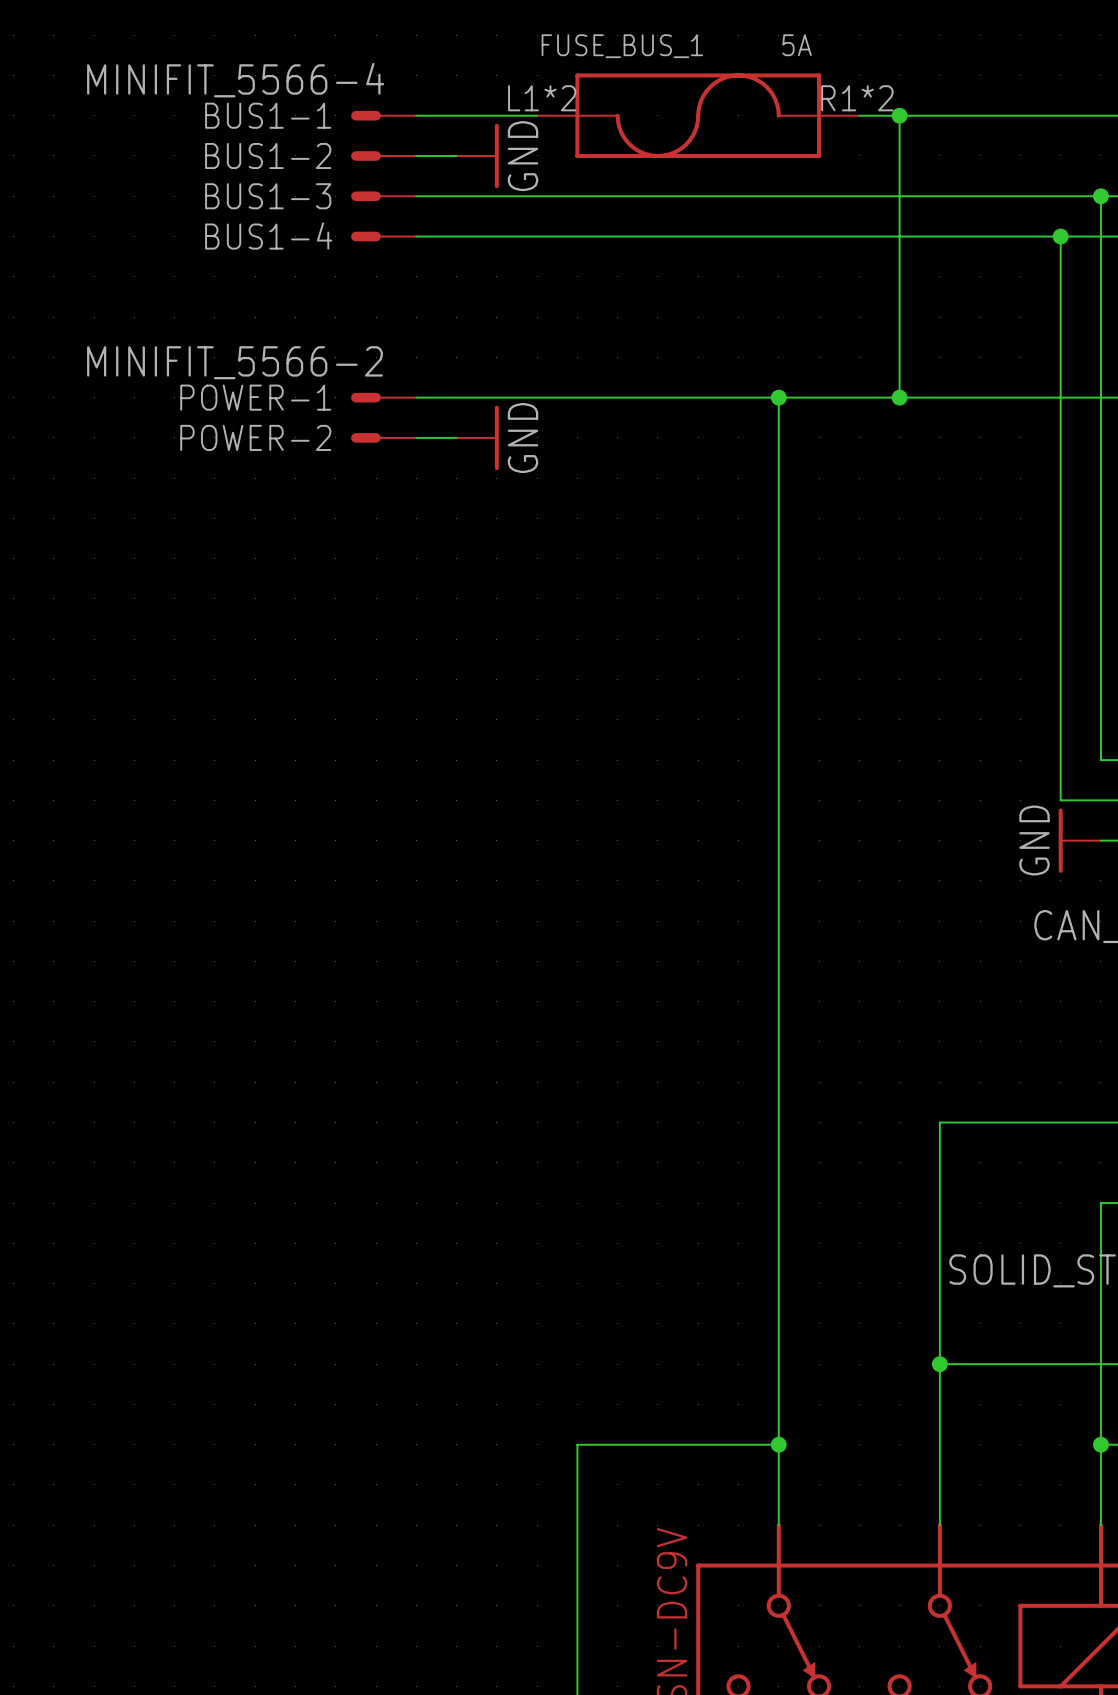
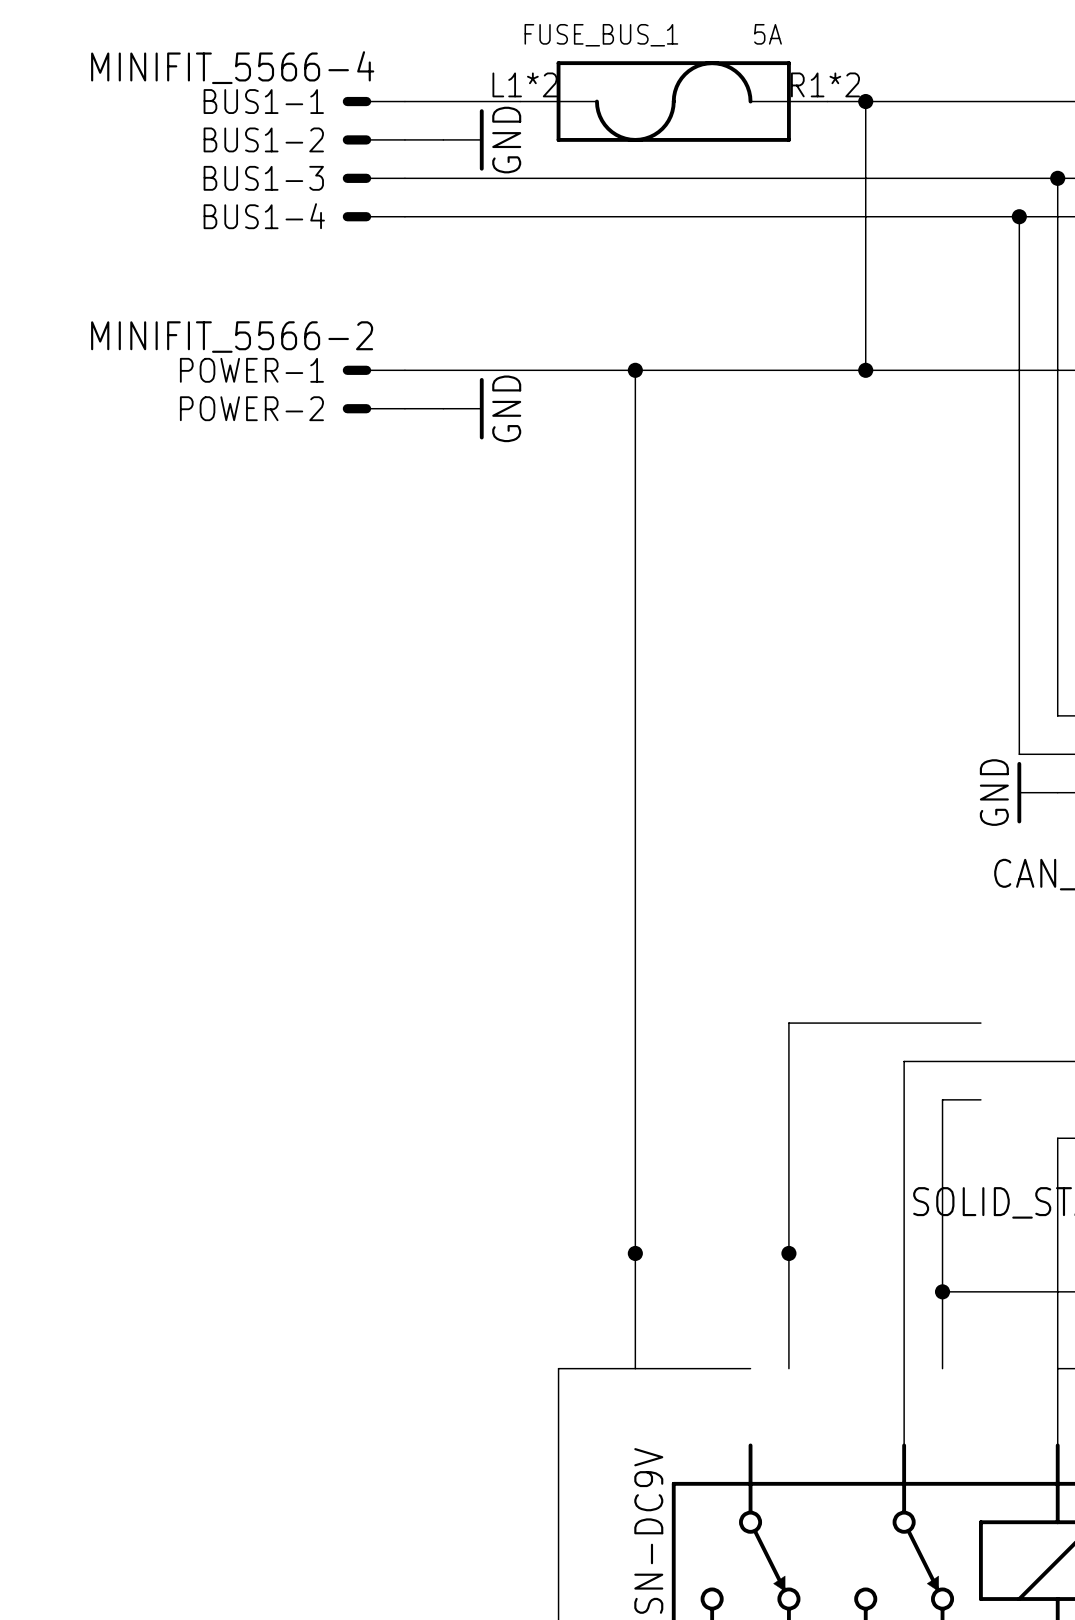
wire: none -> (635, 370) (635, 1368)
junction: none -> (635, 370)
wire: (778, 397) (778, 1525) -> none
junction: (778, 397) -> none
wire: none -> (980, 1023) (788, 1023) (788, 1368)
wire: none -> (980, 1099) (942, 1099) (942, 1368)
junction: none -> (635, 1253)
junction: none -> (788, 1253)
wire: (939, 1364) (980, 1364) -> none
junction position: (939, 1364) -> (942, 1291)
junction: (778, 1444) -> none
junction: (1100, 1444) -> none

